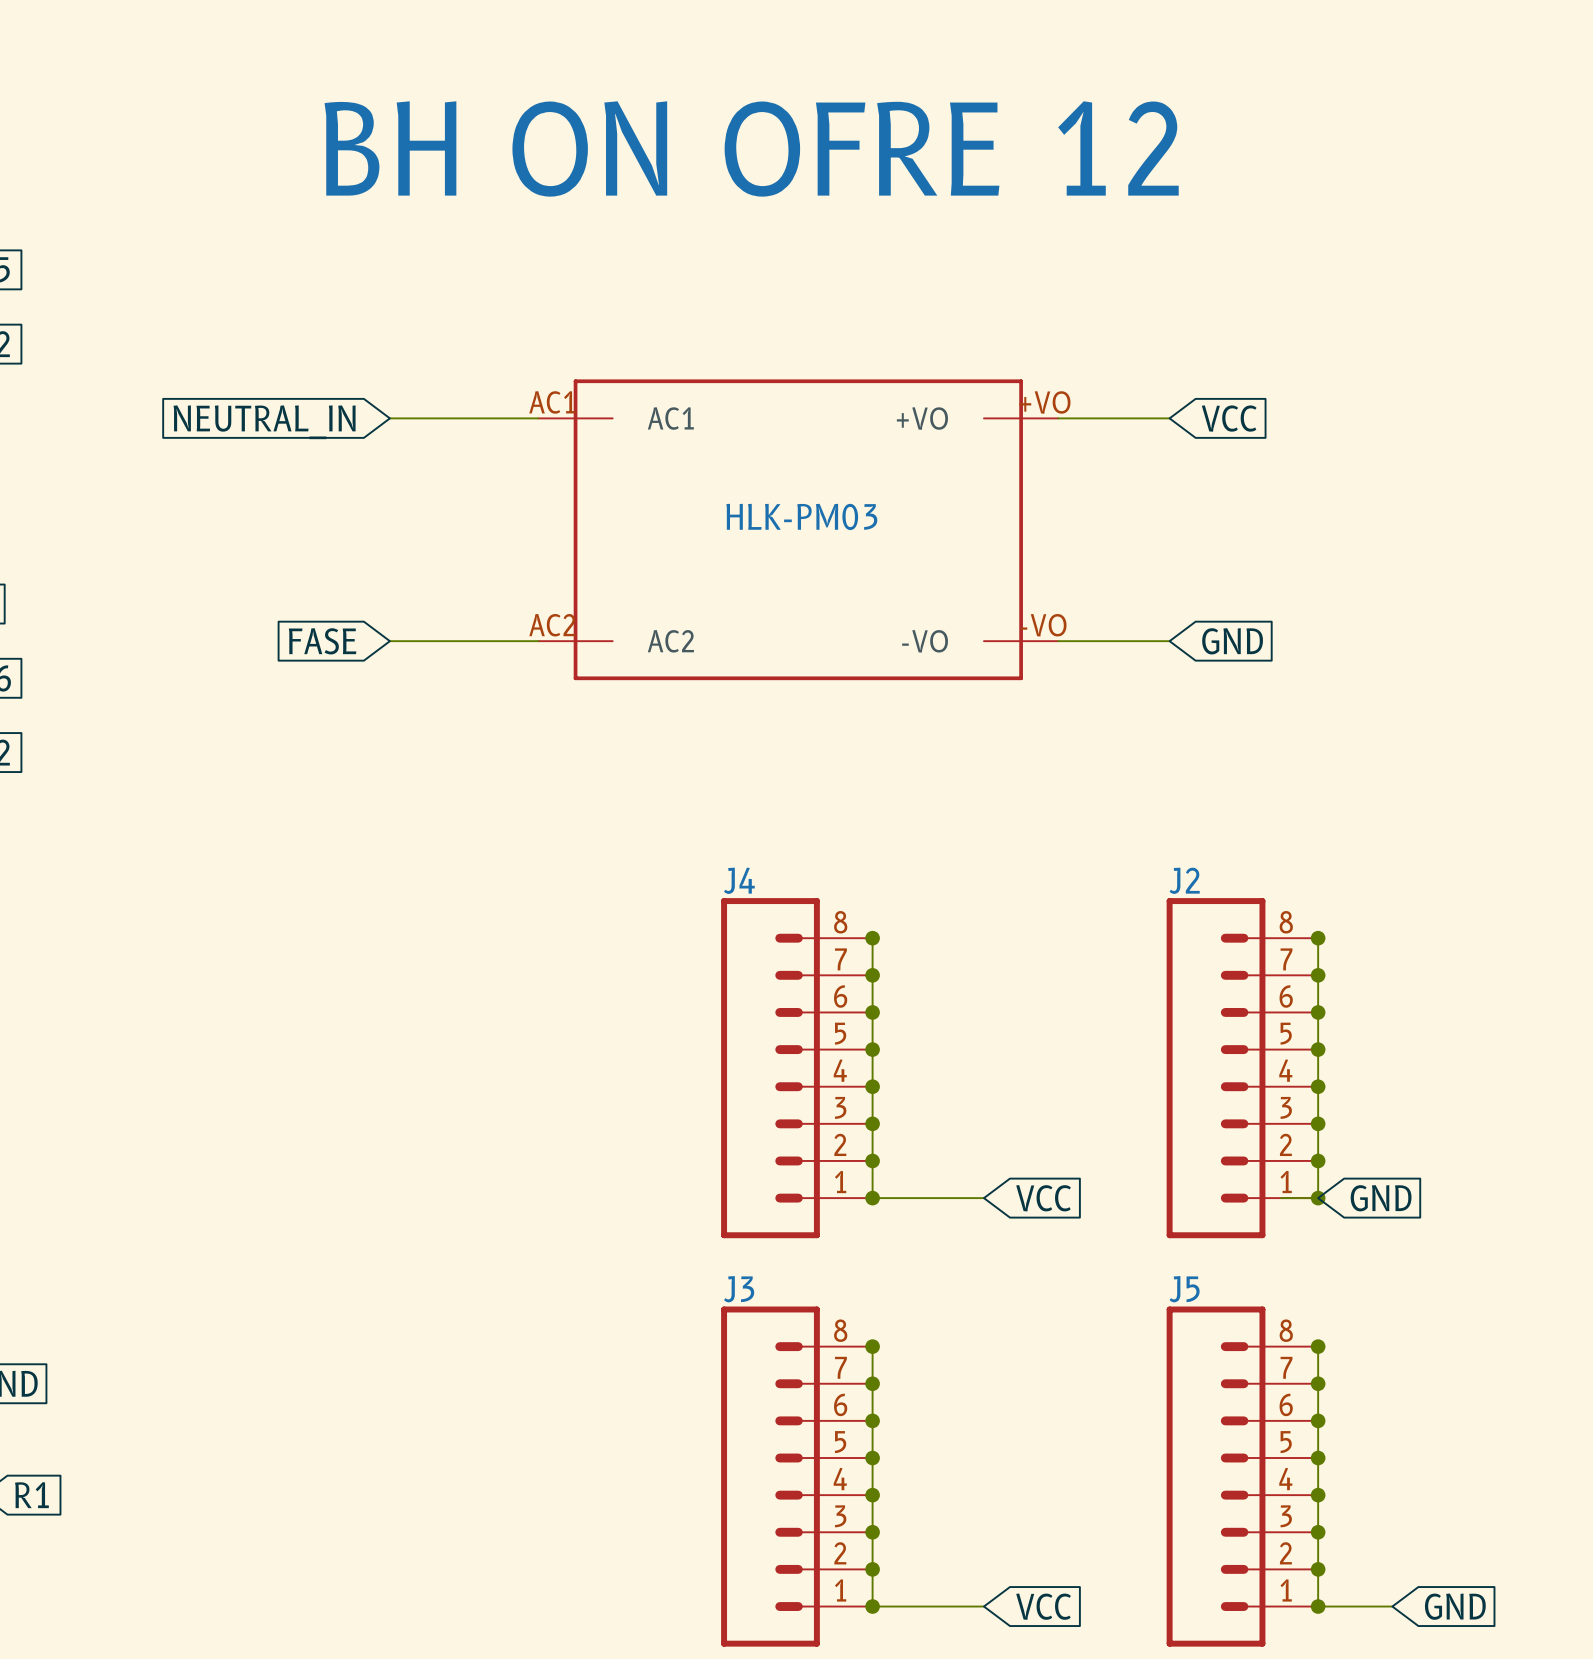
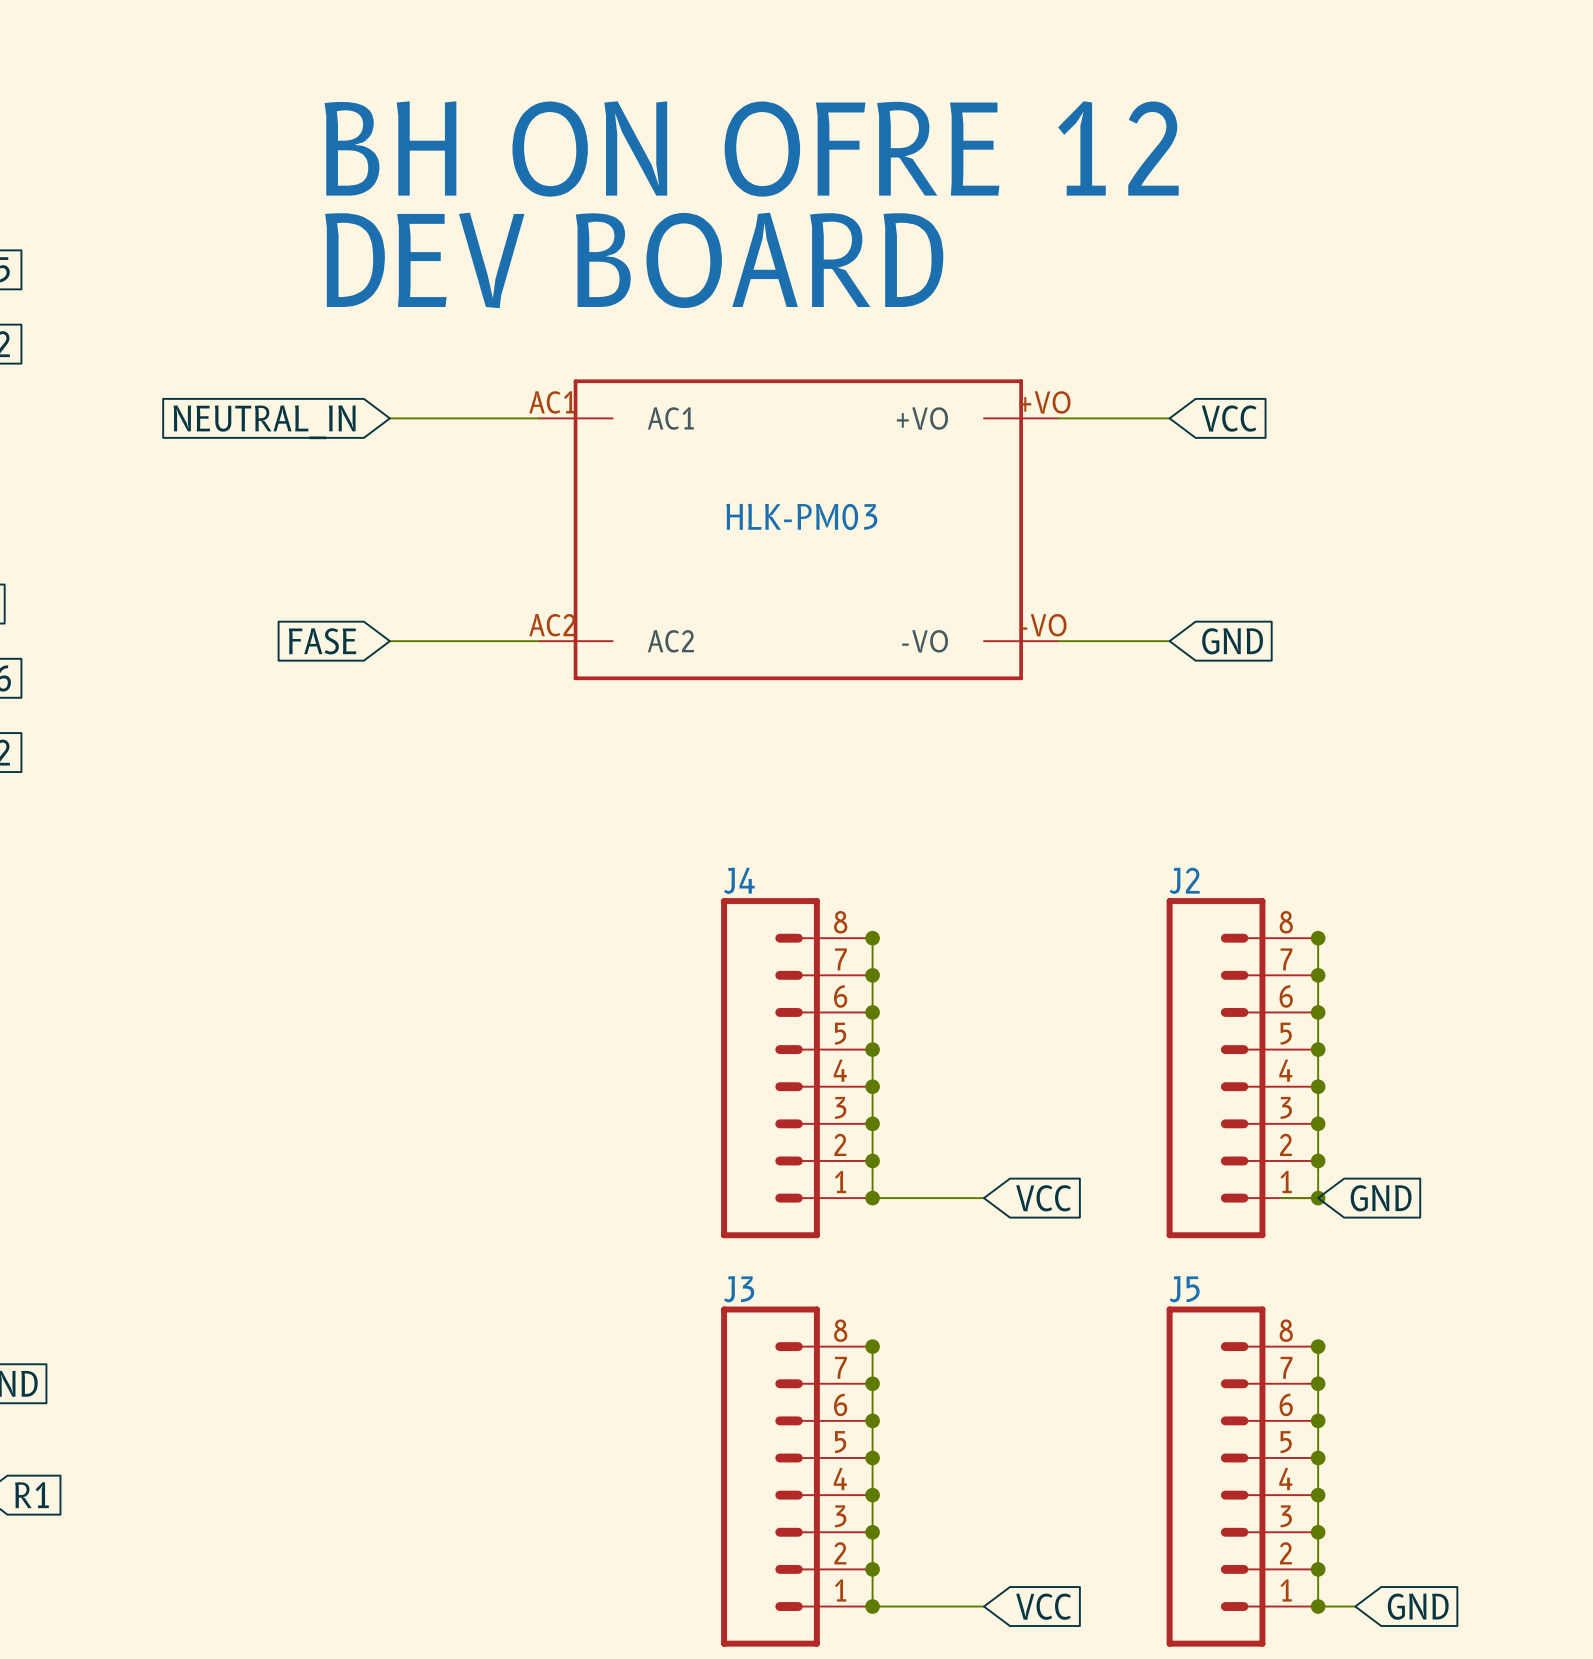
text: none -> DEV BOARD (634, 260)
wire: (1355, 1606) (1392, 1606) -> none
global label position: GND (1455, 1606) -> GND (1418, 1606)

